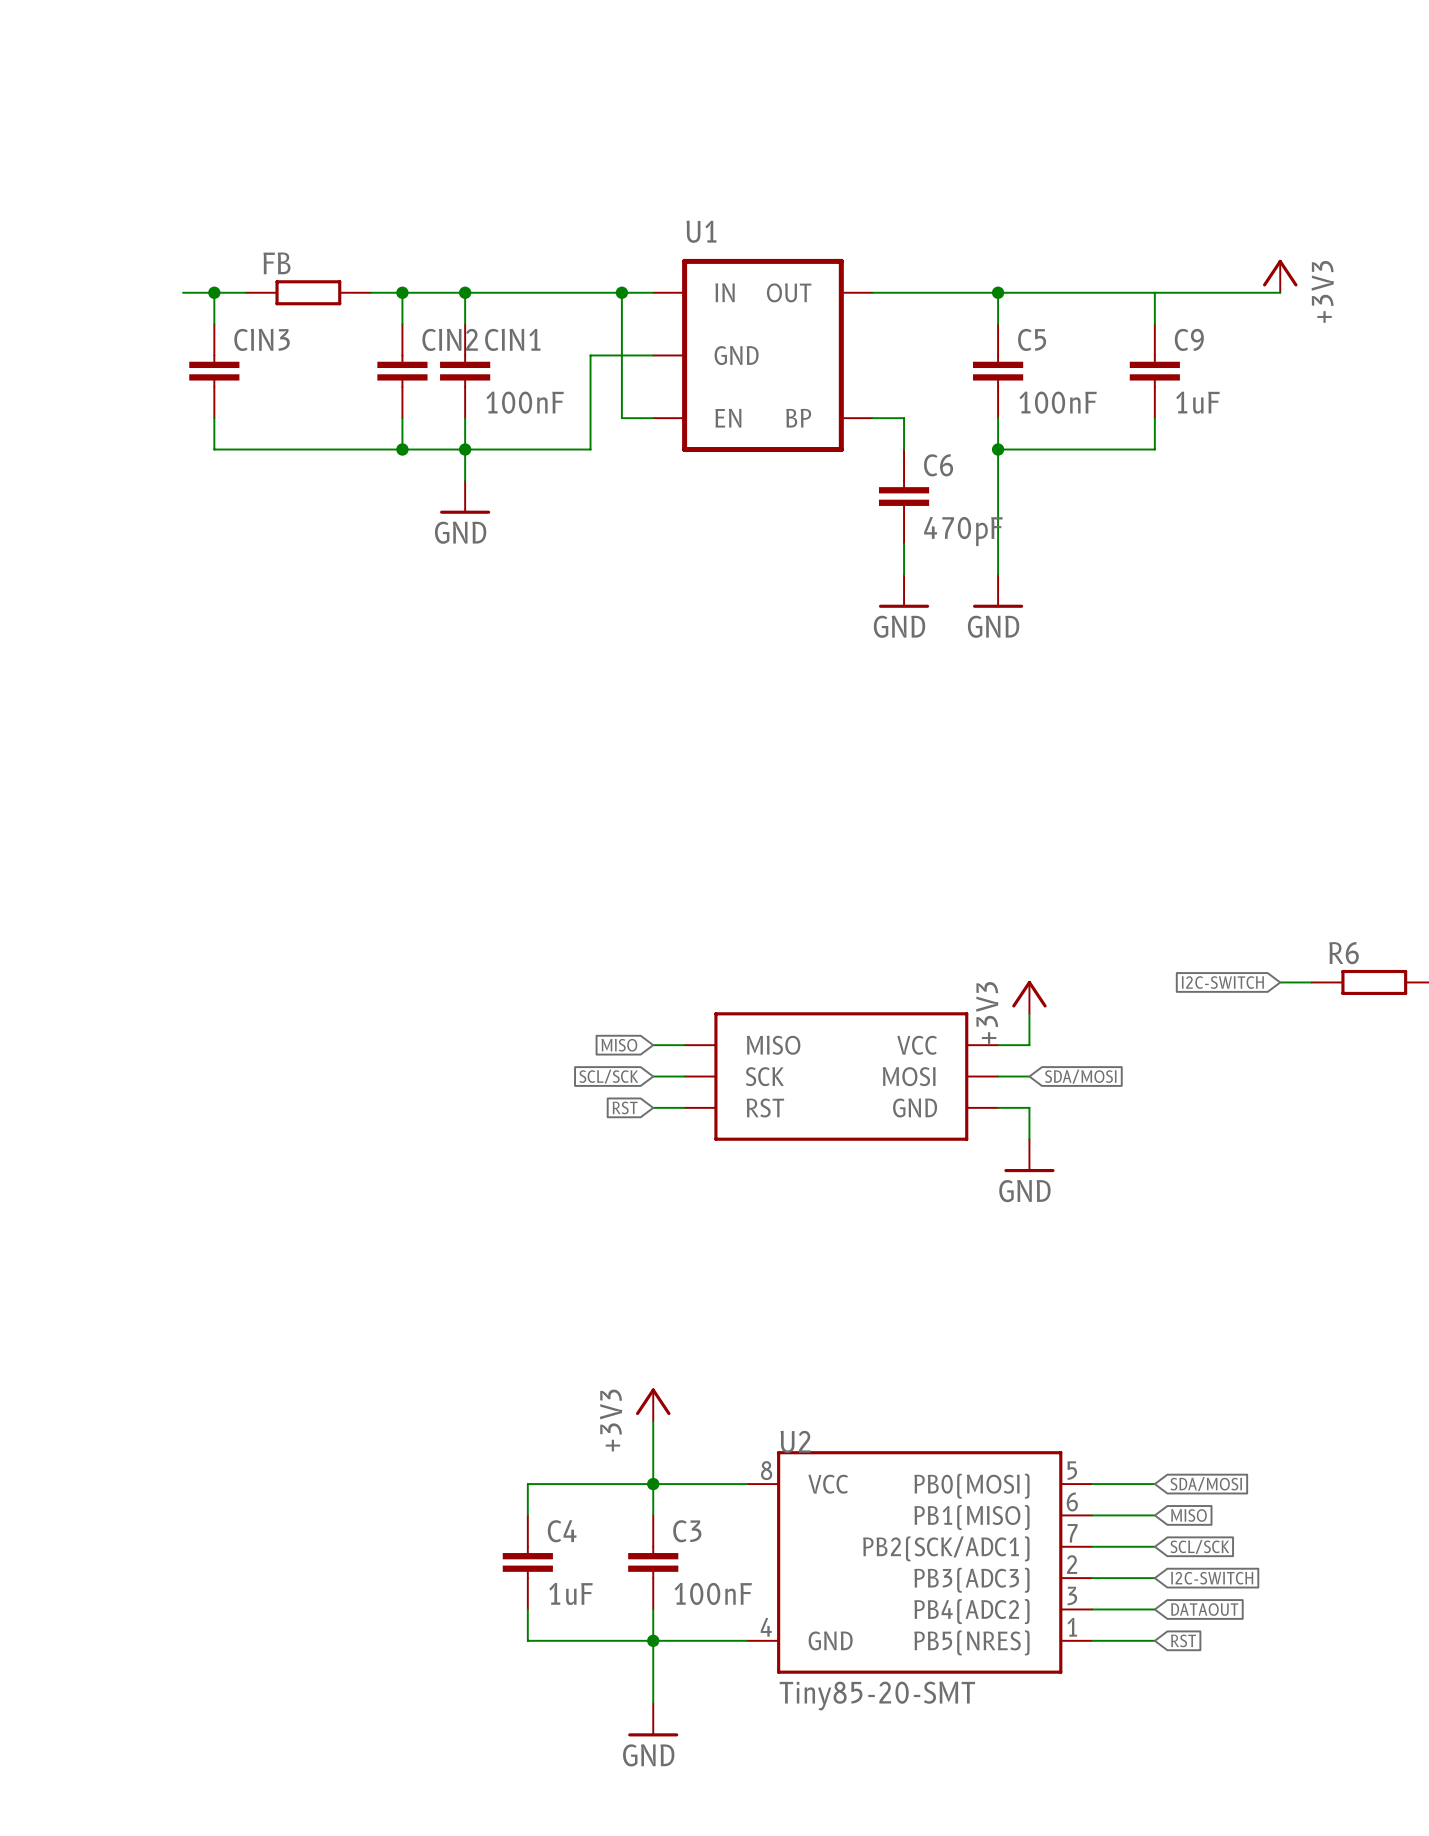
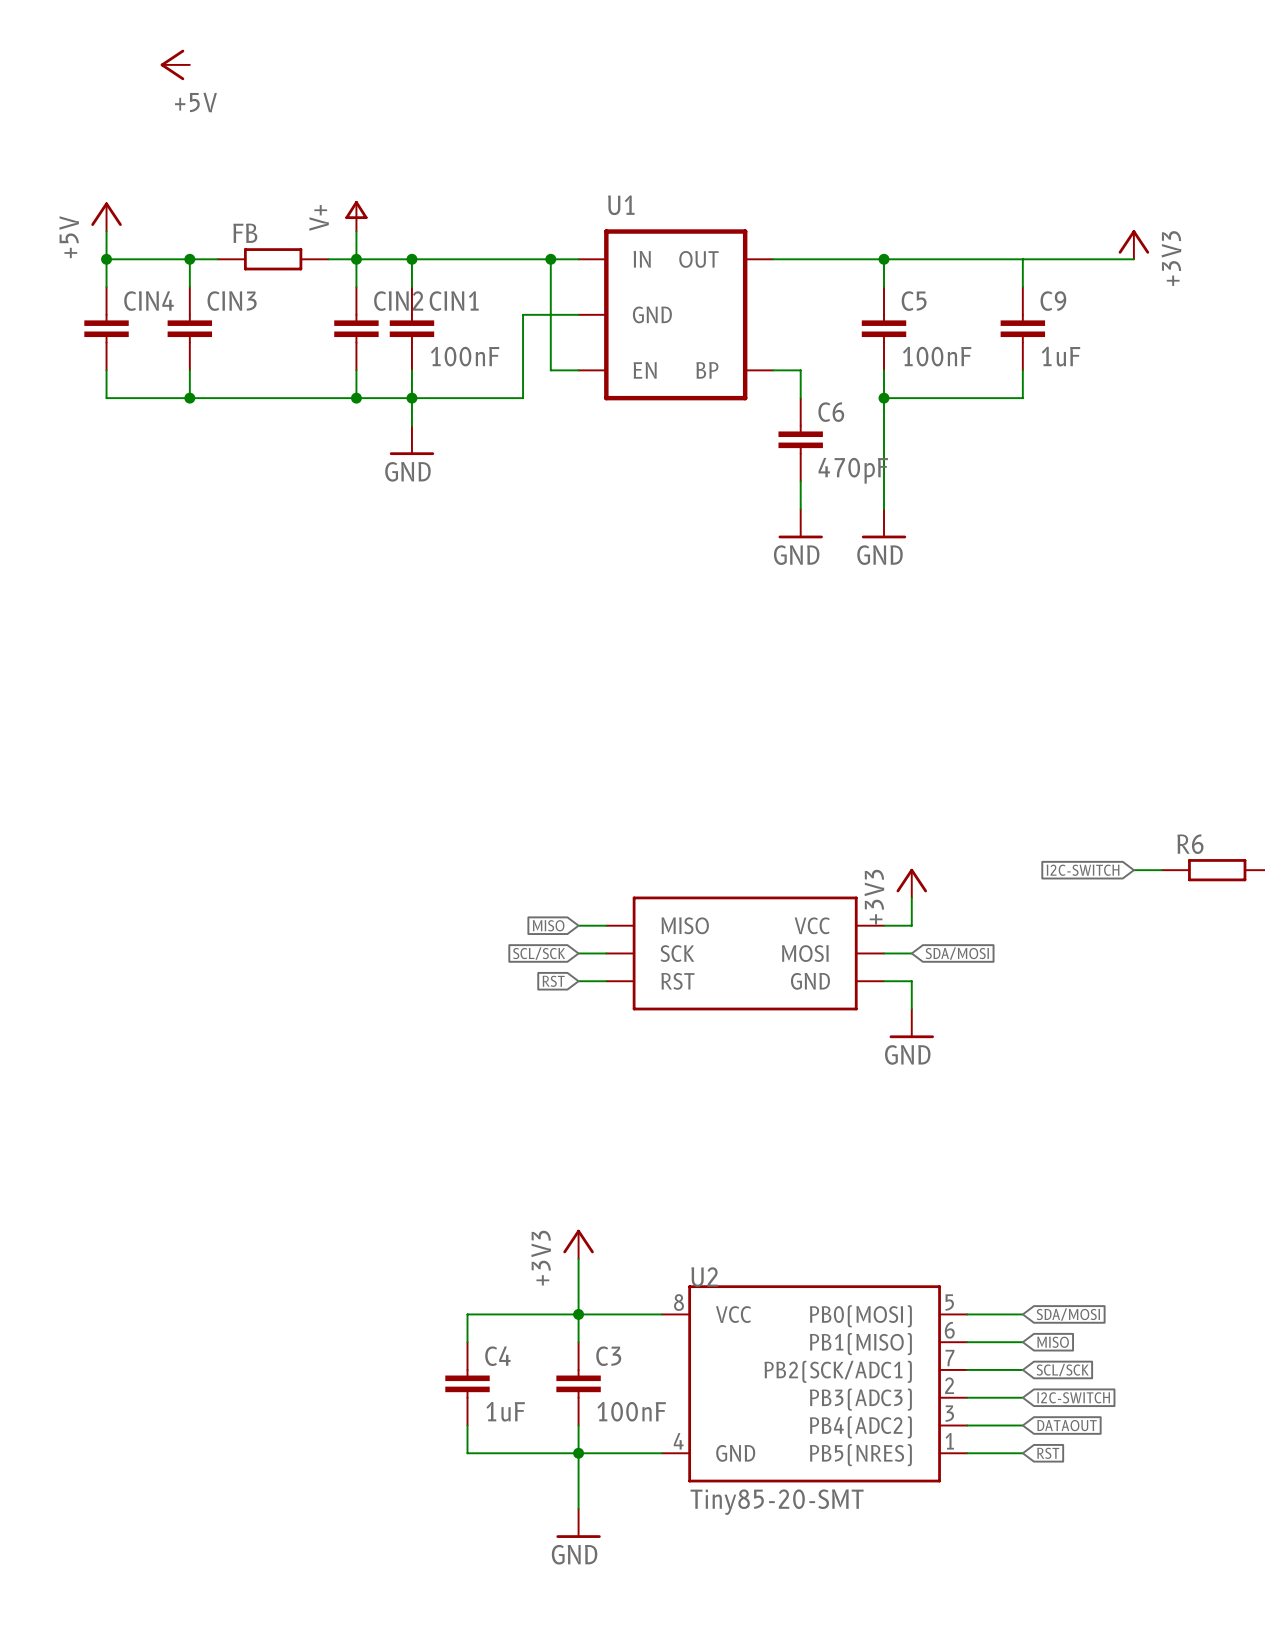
power symbol: none -> +5V (175, 64)
power symbol: none -> +5V (106, 216)
power symbol: none -> V+ (356, 216)
wire: none -> (106, 231) (106, 287)
wire: none -> (356, 231) (356, 259)
wire: none -> (106, 259) (162, 259)
junction: none -> (106, 259)
CIN4: none -> (106, 328)
wire: none -> (106, 370) (106, 398) (189, 398)
junction: none -> (189, 398)

